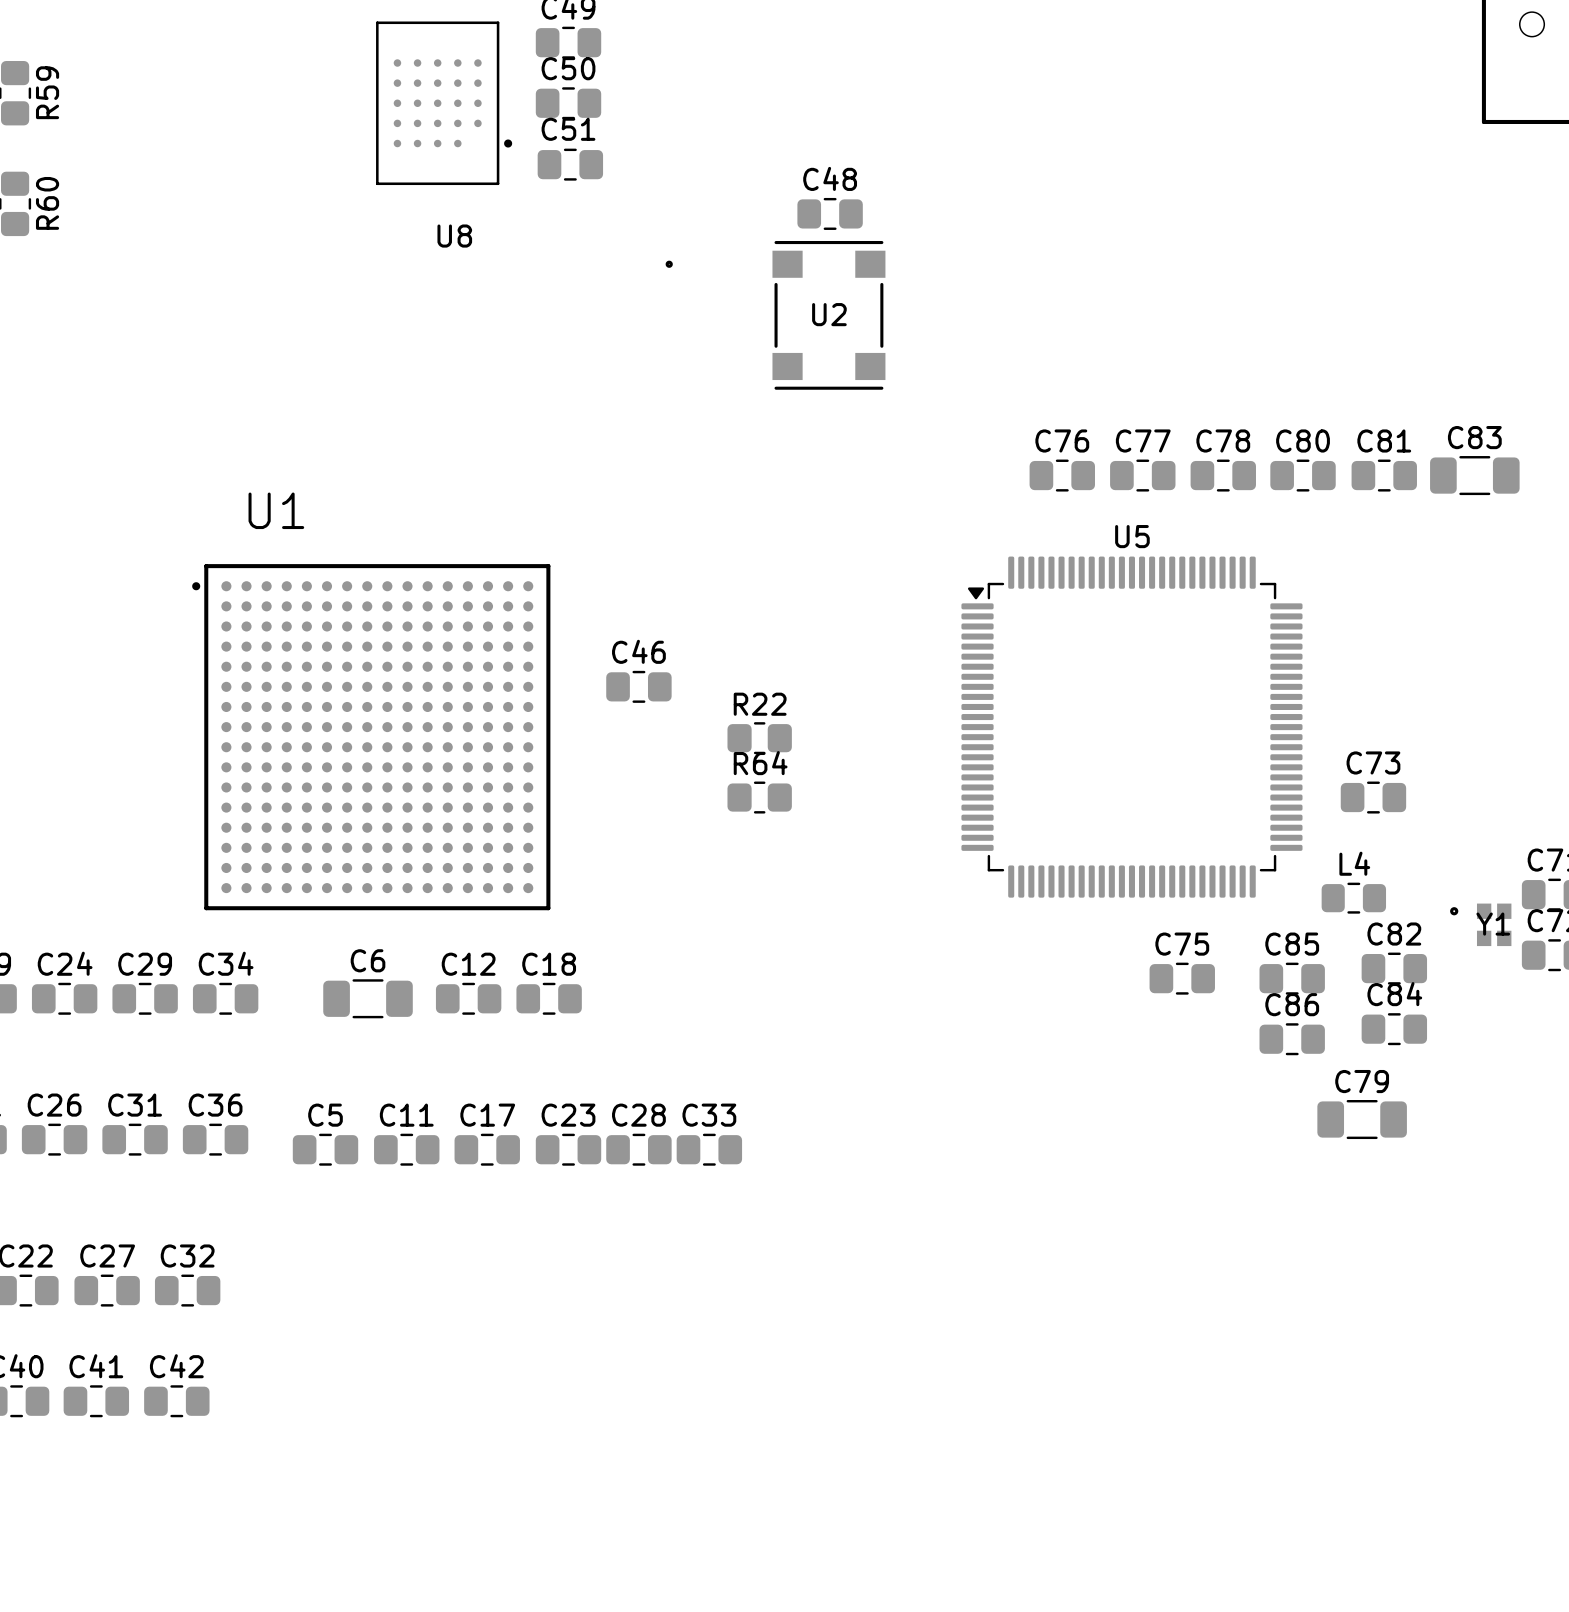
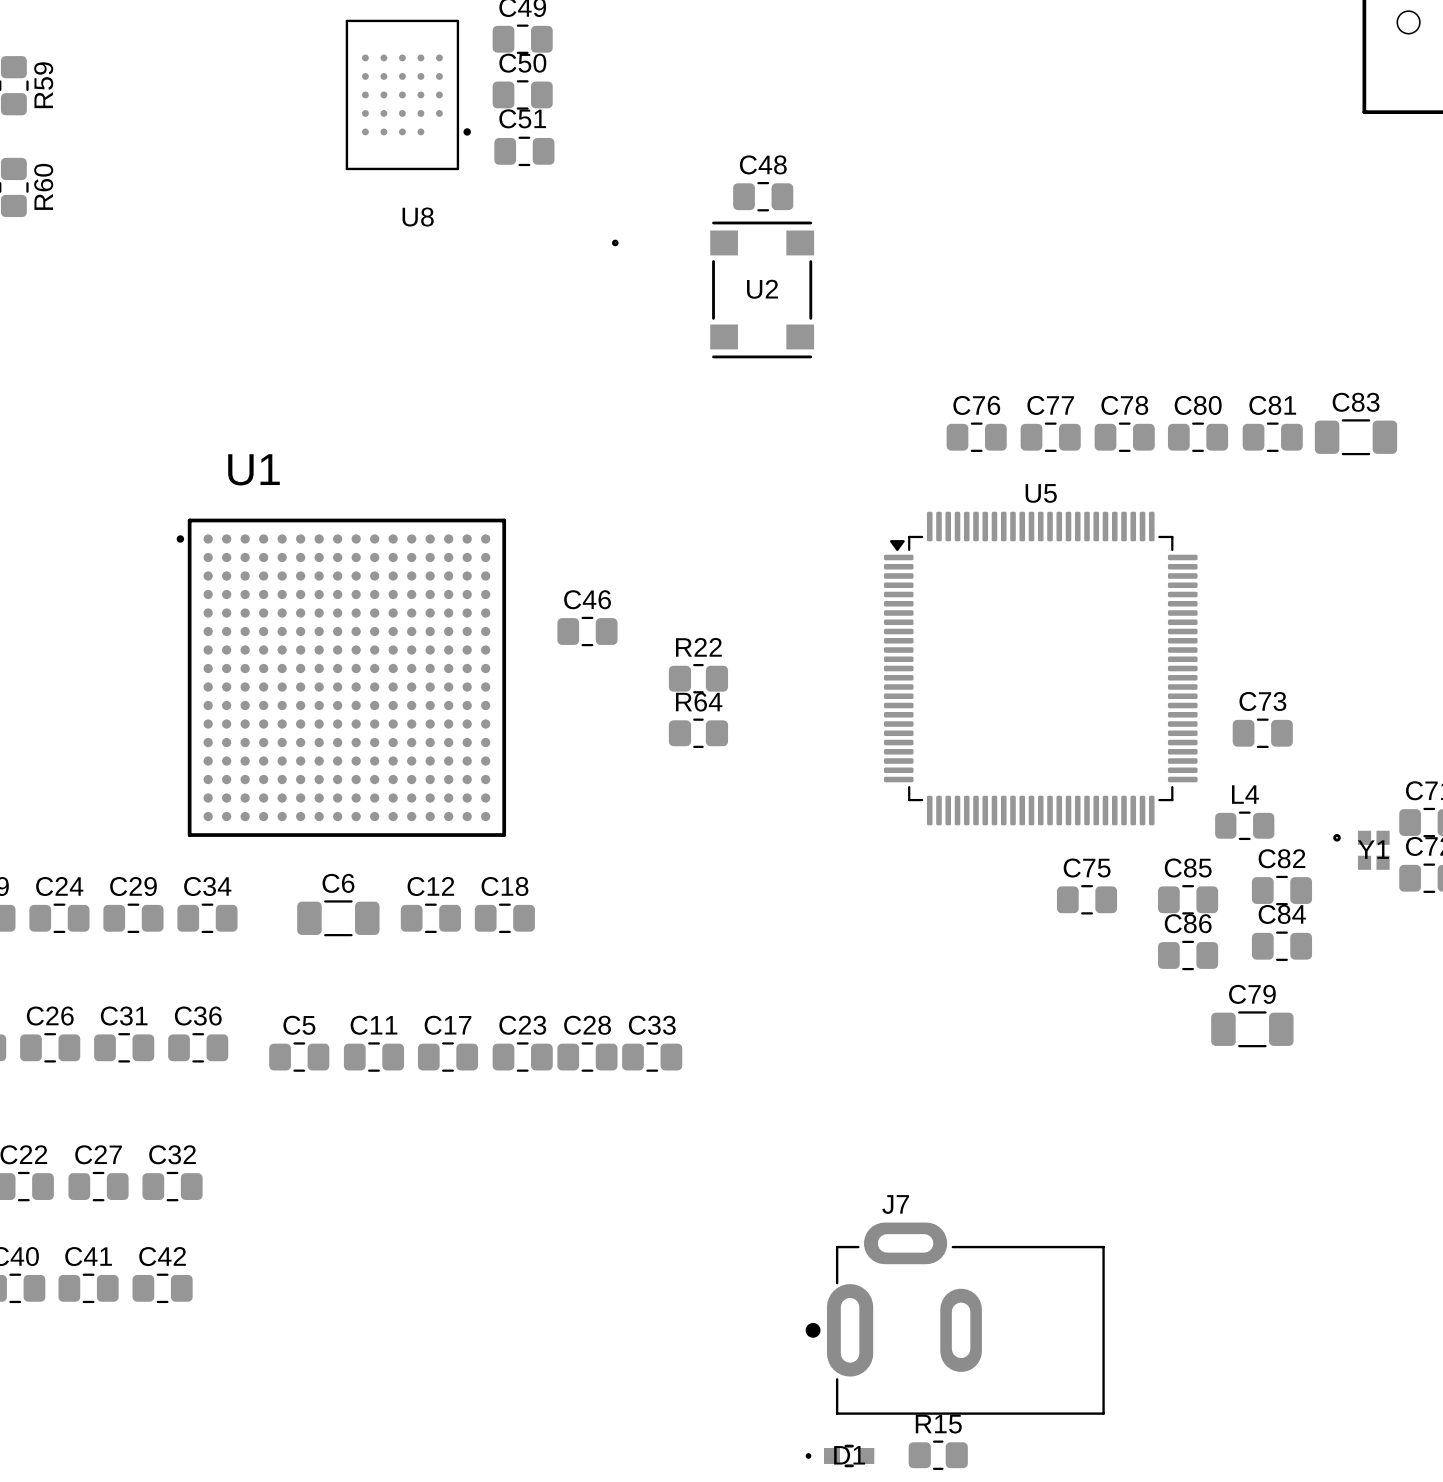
J7: none -> (955, 1318)
R15: none -> (938, 1455)
D1: none -> (839, 1455)

